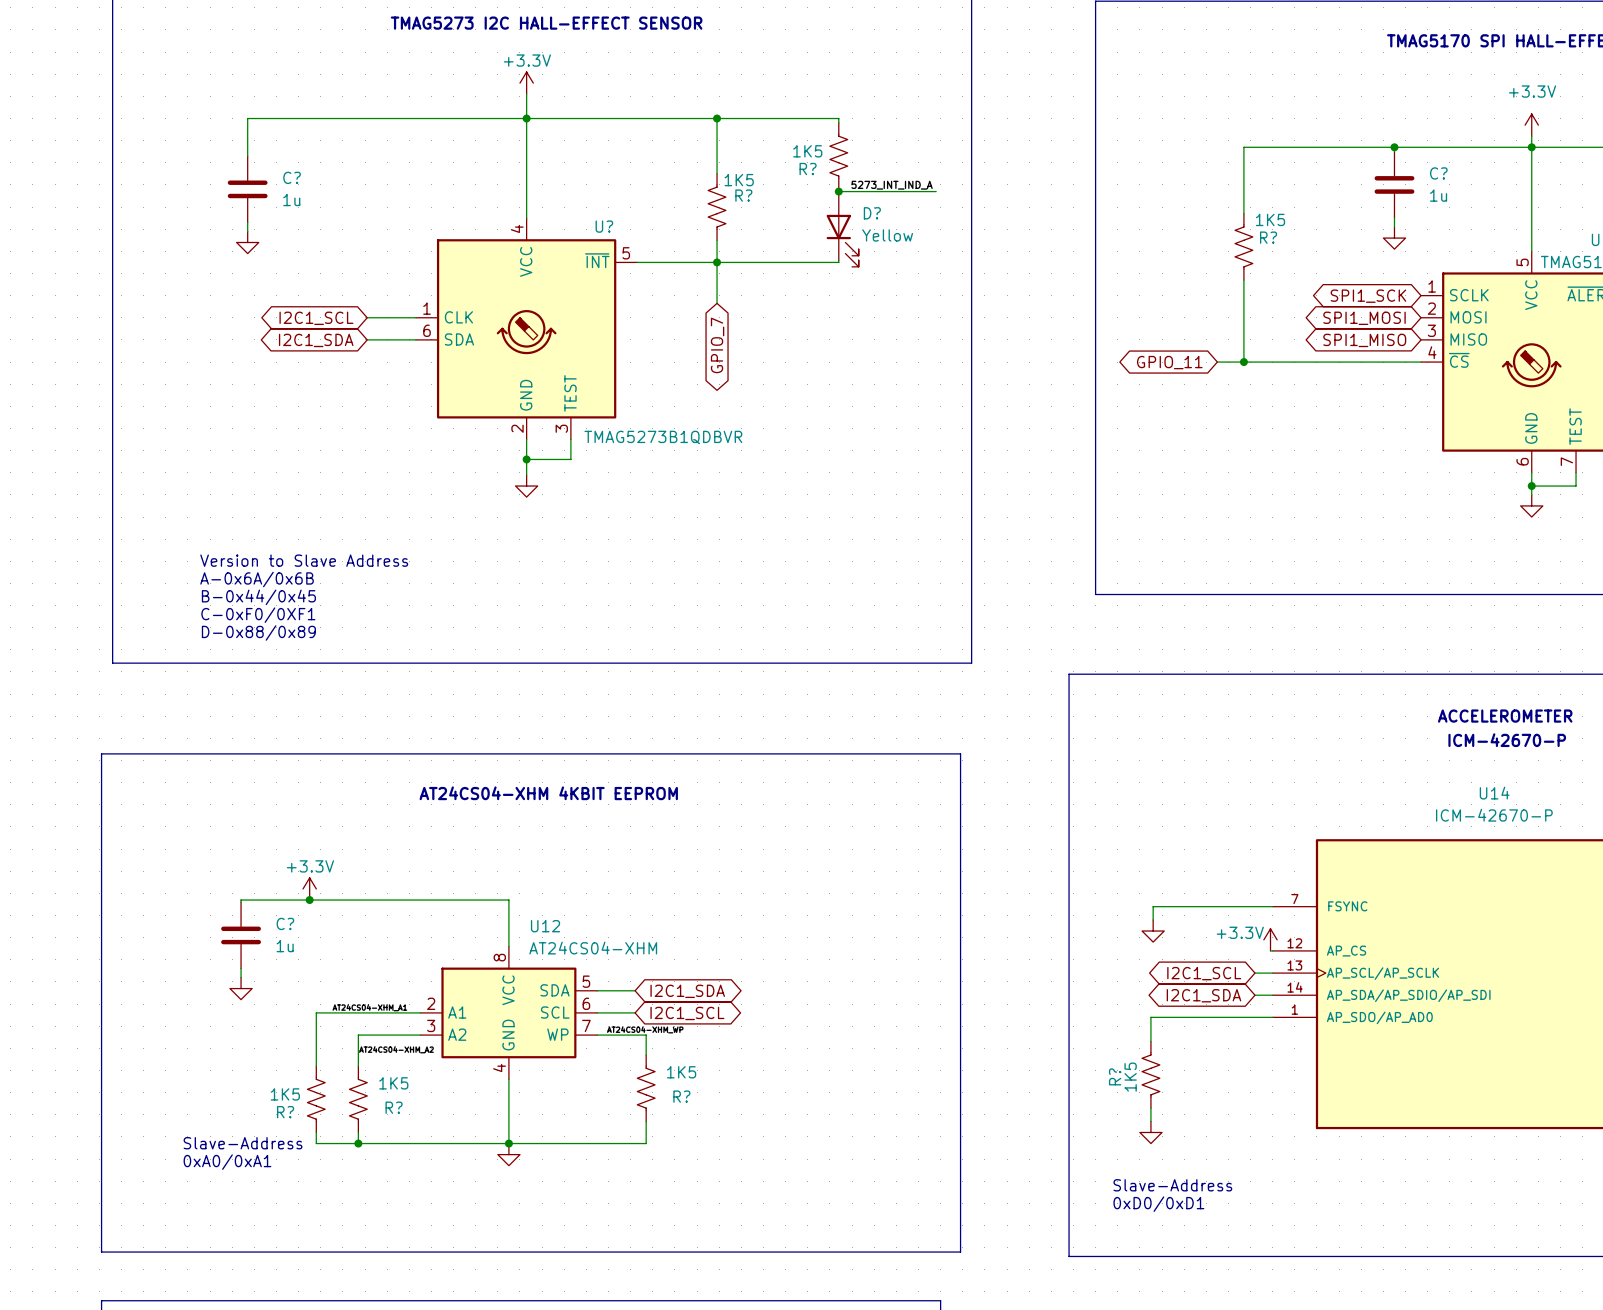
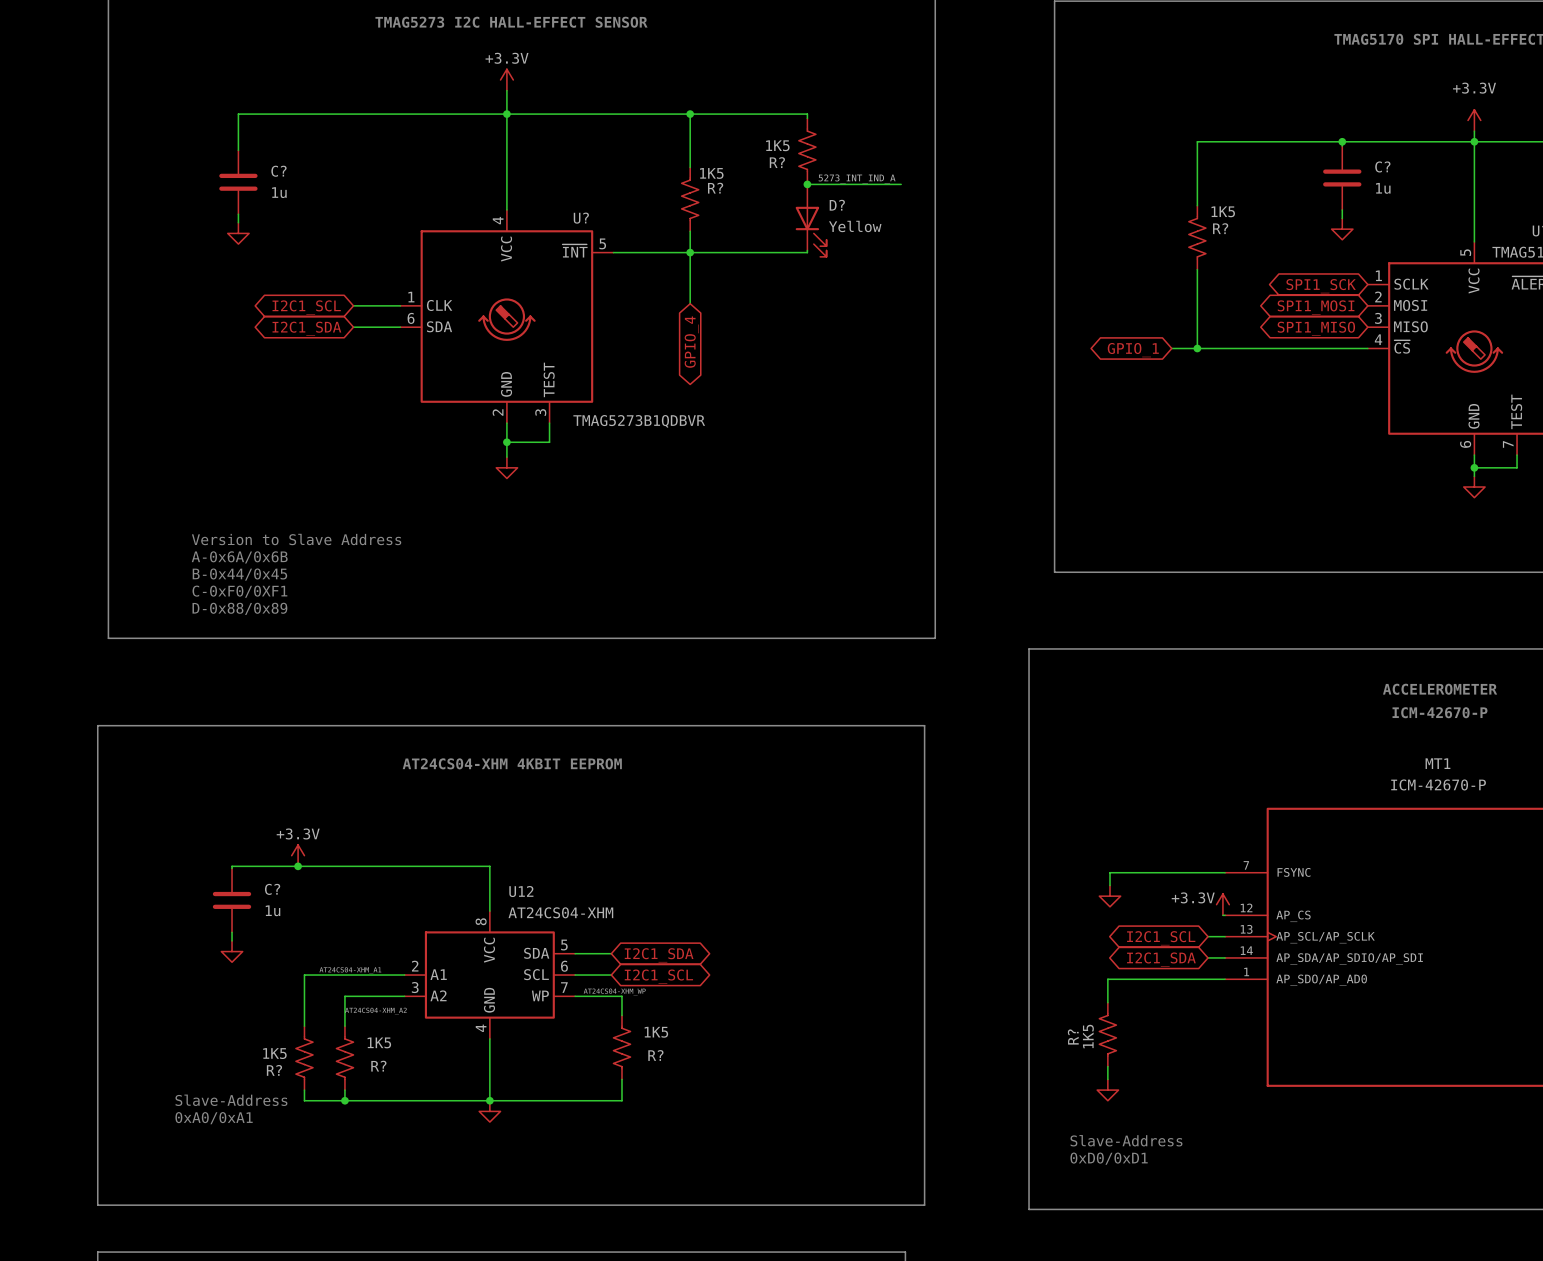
wire: none -> (690, 292) (690, 303)
global label: GPIO_7 (717, 345) -> GPIO_4 (691, 342)
global label: GPIO_11 (1169, 362) -> GPIO_1 (1133, 350)
U14 name: U14 (1494, 793) -> MT1 (1437, 763)

